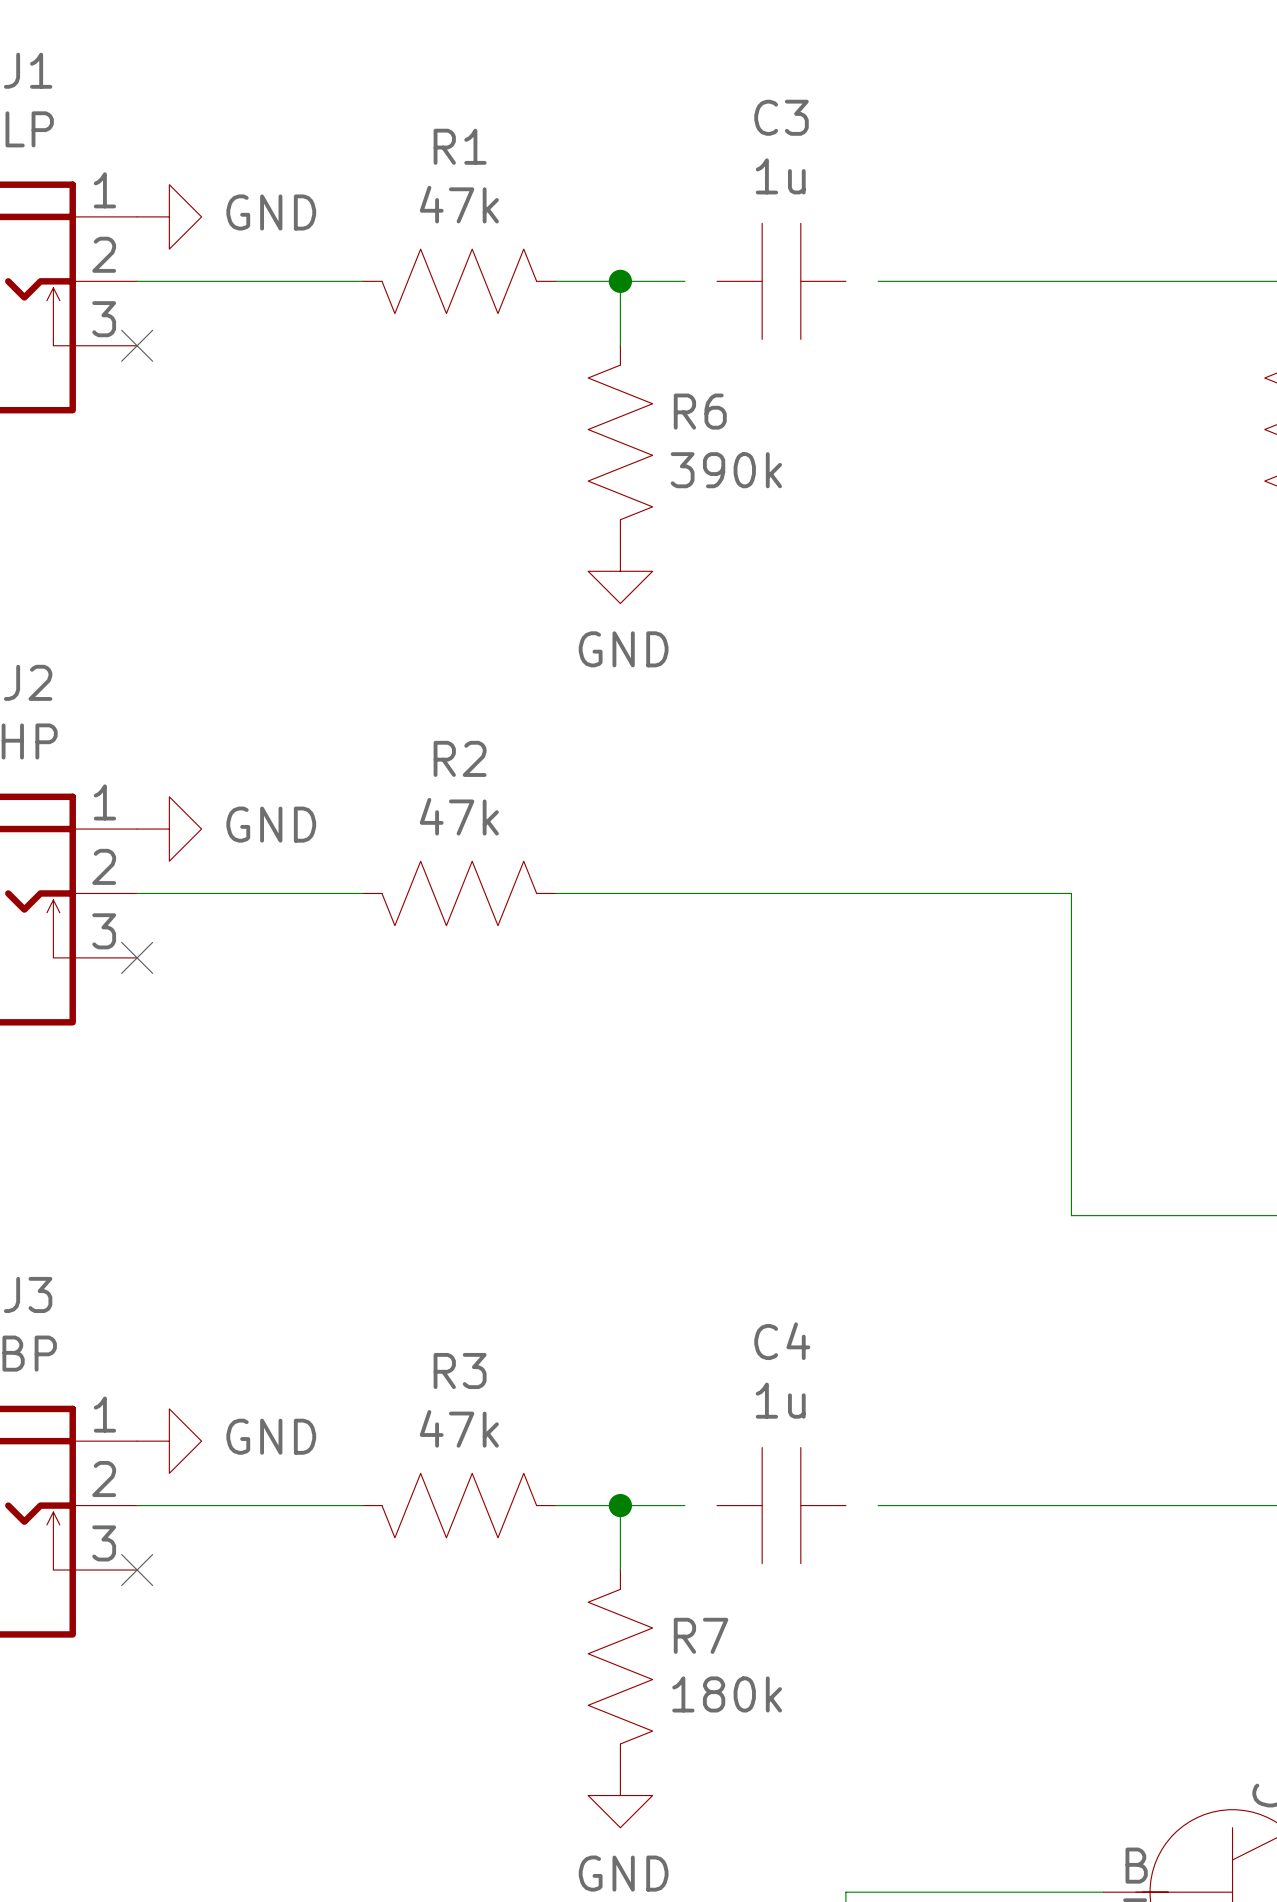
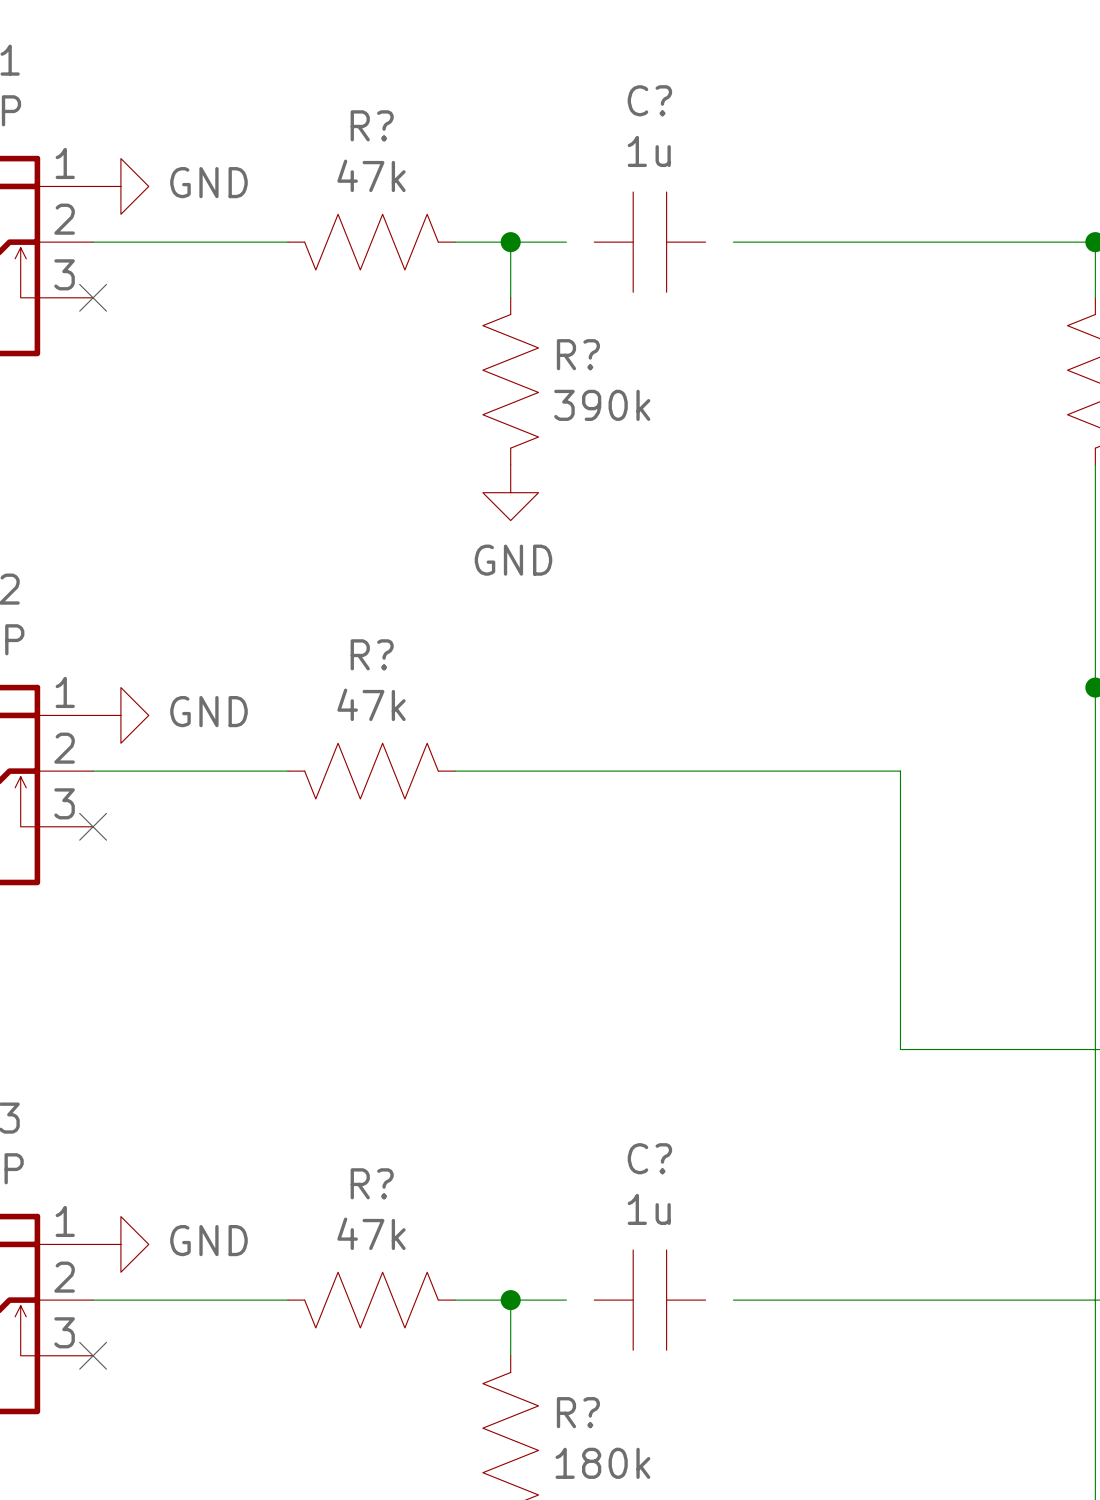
C3 name: C3 (781, 117) -> C? (649, 100)
R1 name: R1 (460, 146) -> R? (372, 125)
R6 name: R6 (700, 411) -> R? (578, 354)
R2 name: R2 (460, 758) -> R? (372, 654)
C4 name: C4 (782, 1341) -> C? (649, 1158)
R3 name: R3 (460, 1371) -> R? (372, 1183)
R7 name: R7 (701, 1635) -> R? (578, 1412)

